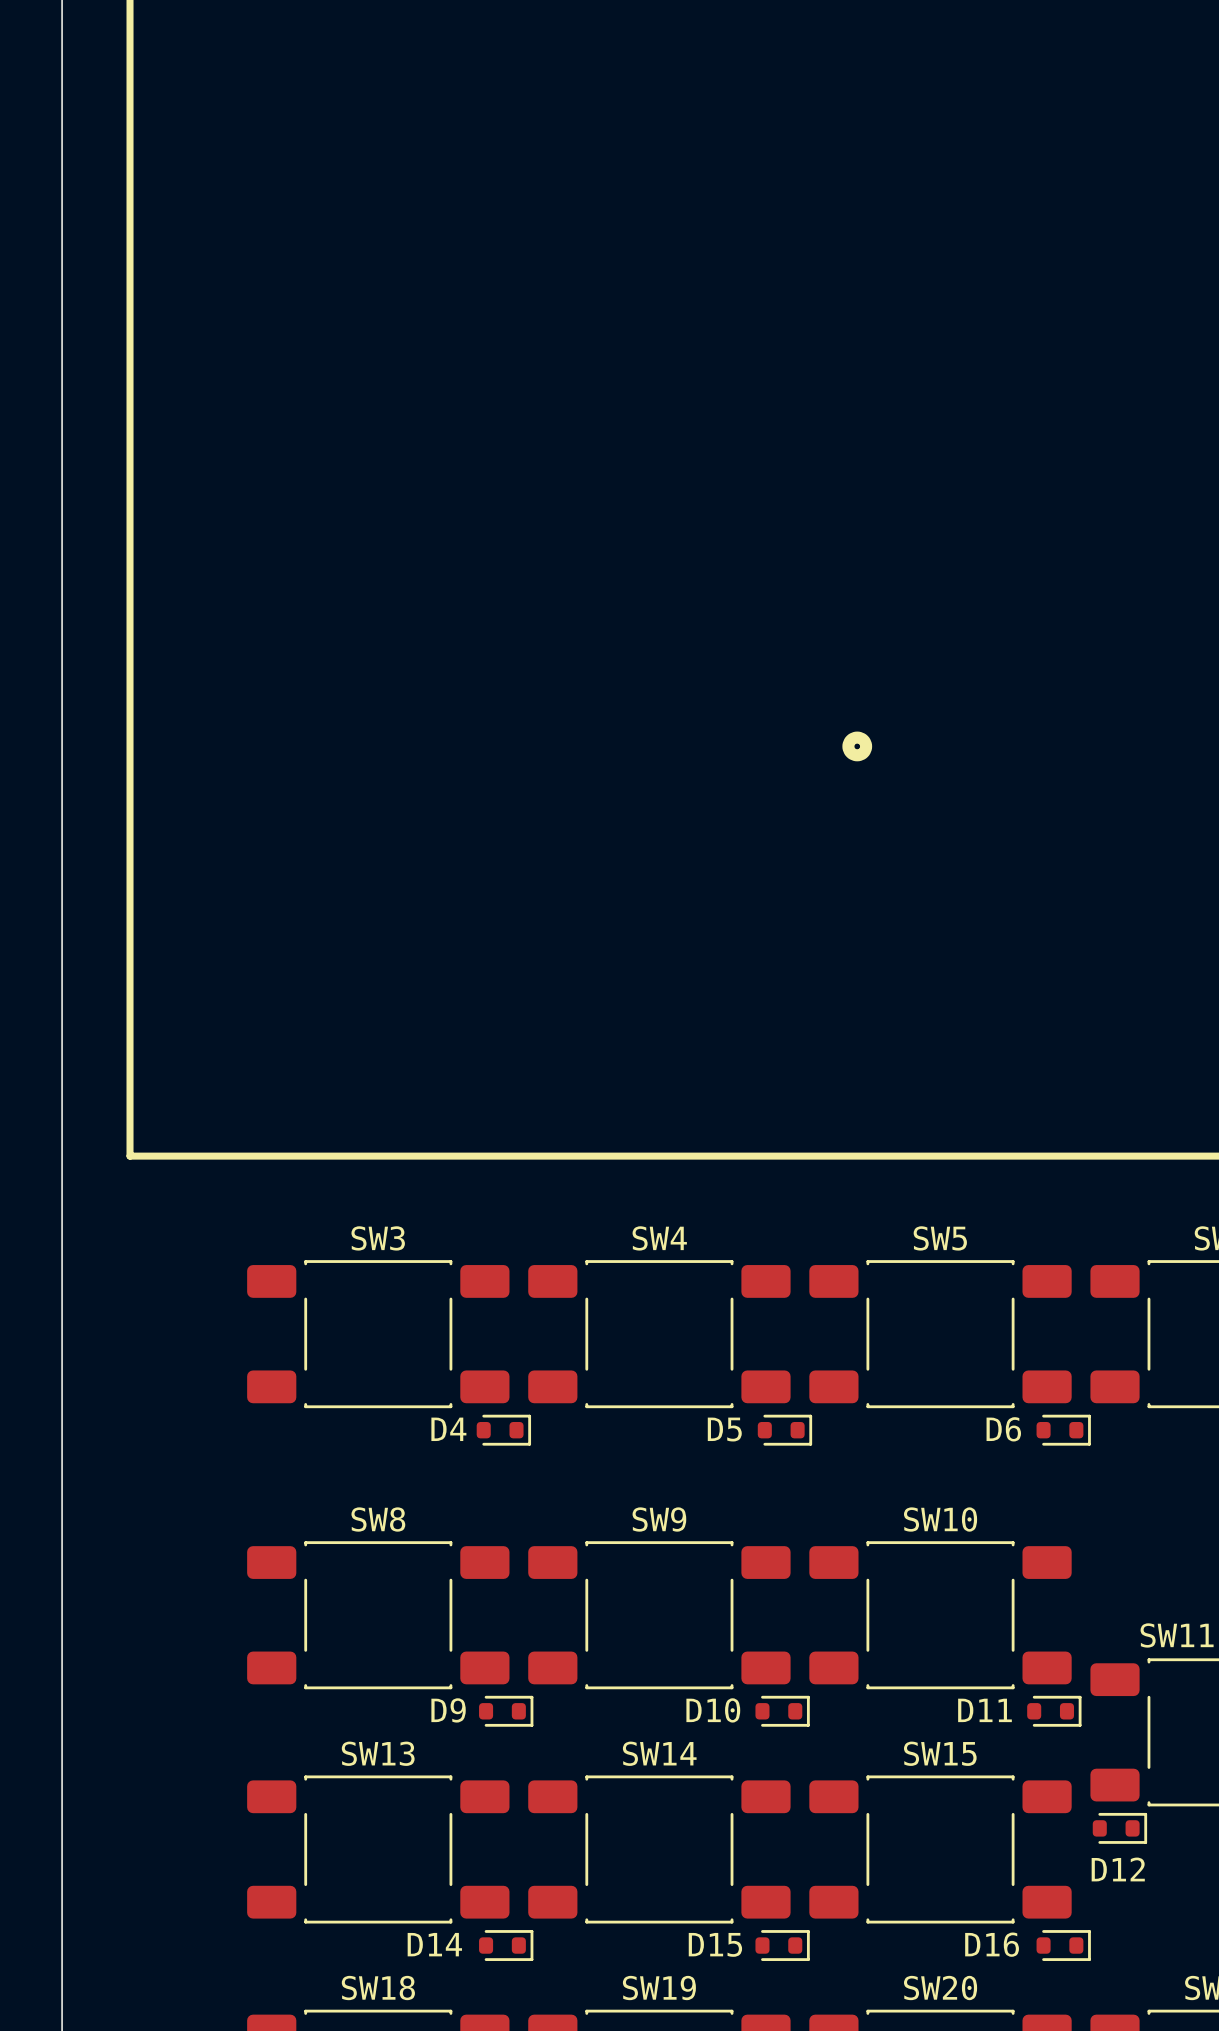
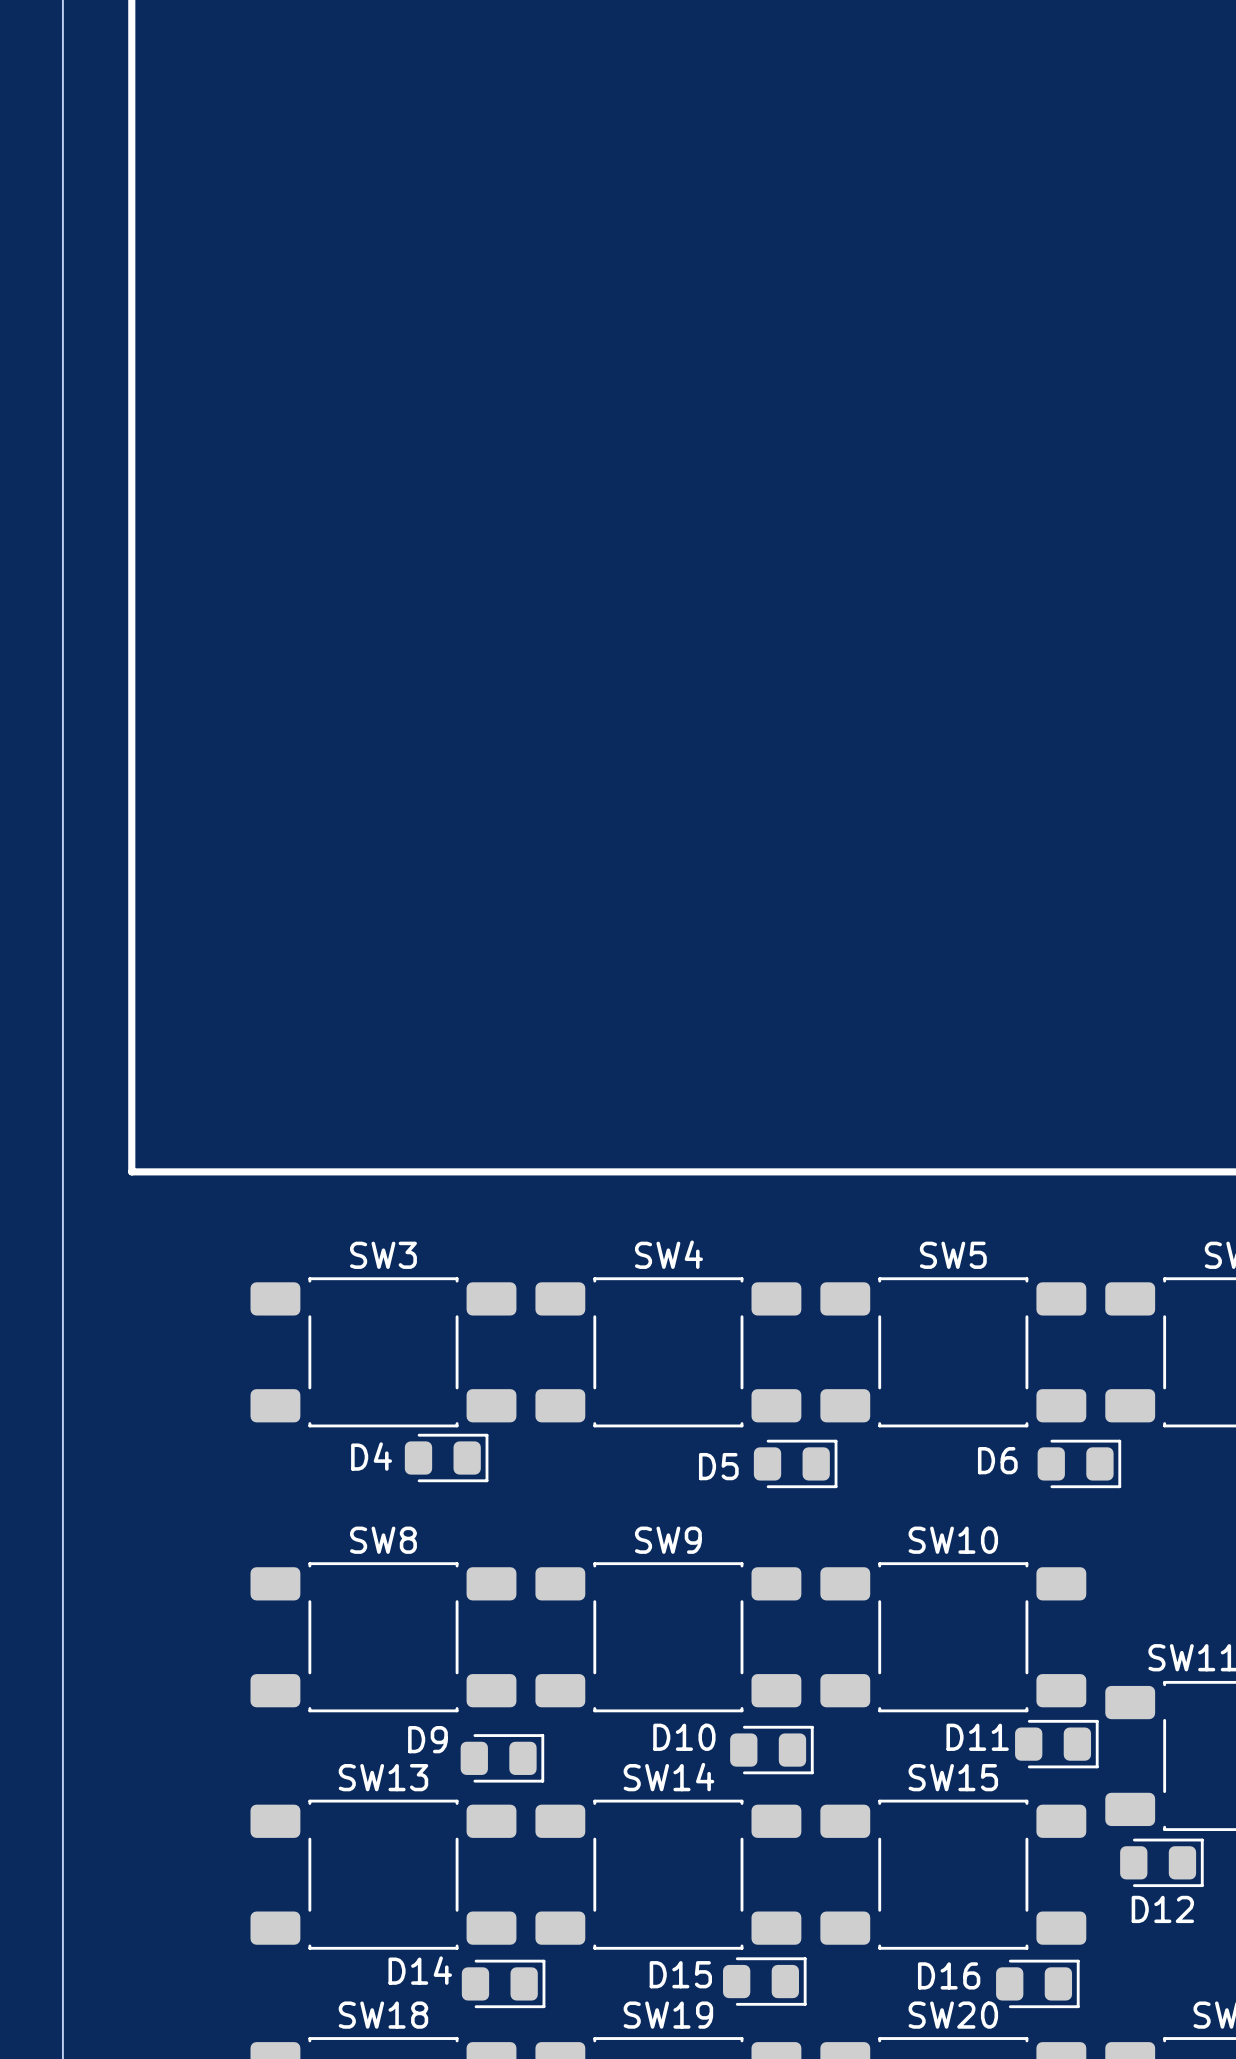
part: (857, 746) -> none
D4 footprint: [476, 1414, 532, 1446] -> [404, 1433, 489, 1483]
D5 footprint: [757, 1414, 813, 1446] -> [753, 1439, 838, 1489]
D6 footprint: [1036, 1414, 1091, 1446] -> [1037, 1439, 1122, 1489]
D9 footprint: [479, 1695, 534, 1727] -> [460, 1734, 545, 1783]
D10 footprint: [755, 1695, 810, 1727] -> [730, 1725, 814, 1775]
D11 footprint: [1027, 1695, 1082, 1727] -> [1015, 1719, 1099, 1769]
D12 footprint: [1092, 1812, 1148, 1844] -> [1120, 1838, 1204, 1888]
D14 footprint: [479, 1930, 534, 1961] -> [461, 1959, 546, 2009]
D15 footprint: [755, 1930, 810, 1961] -> [723, 1957, 807, 2006]
D16 footprint: [1036, 1930, 1091, 1961] -> [996, 1959, 1080, 2009]

